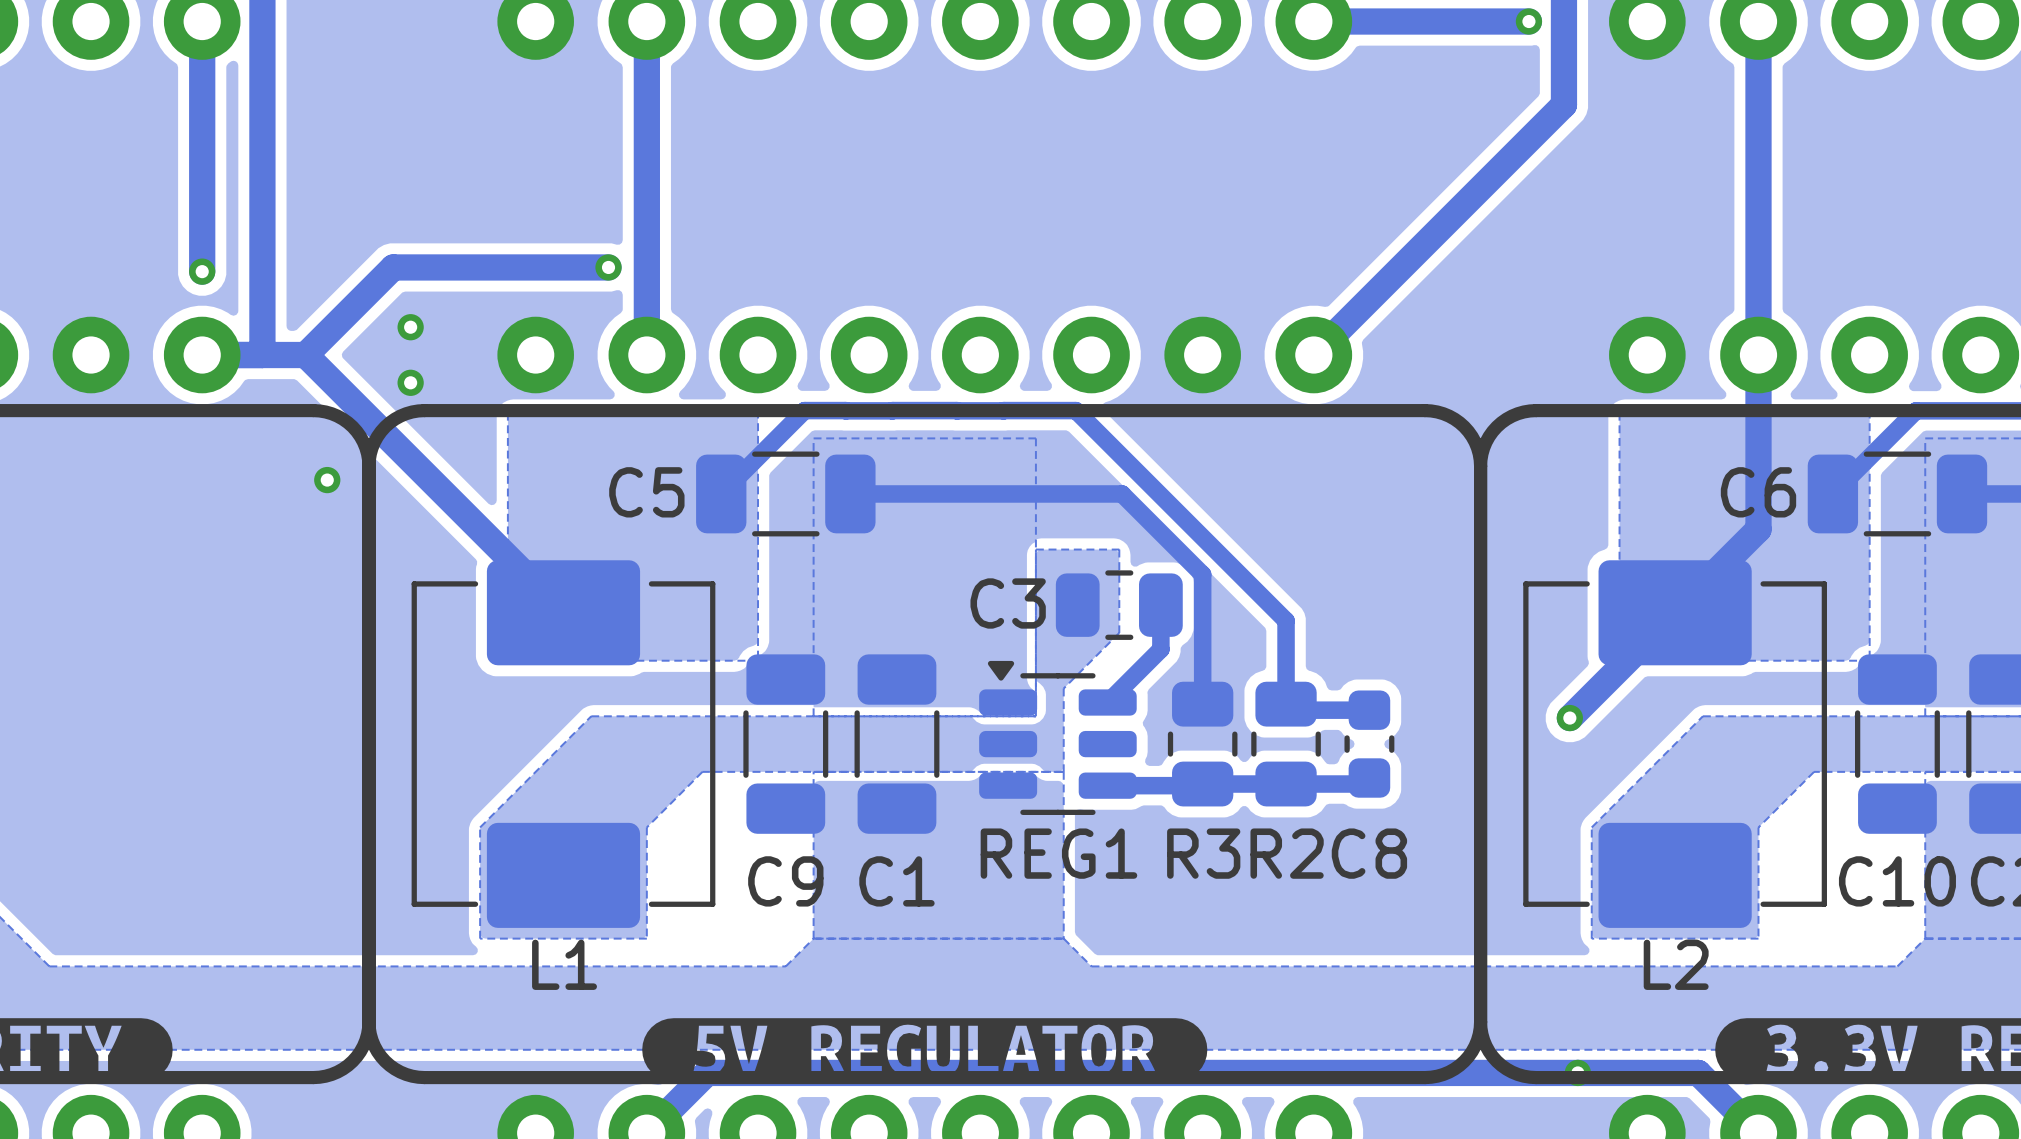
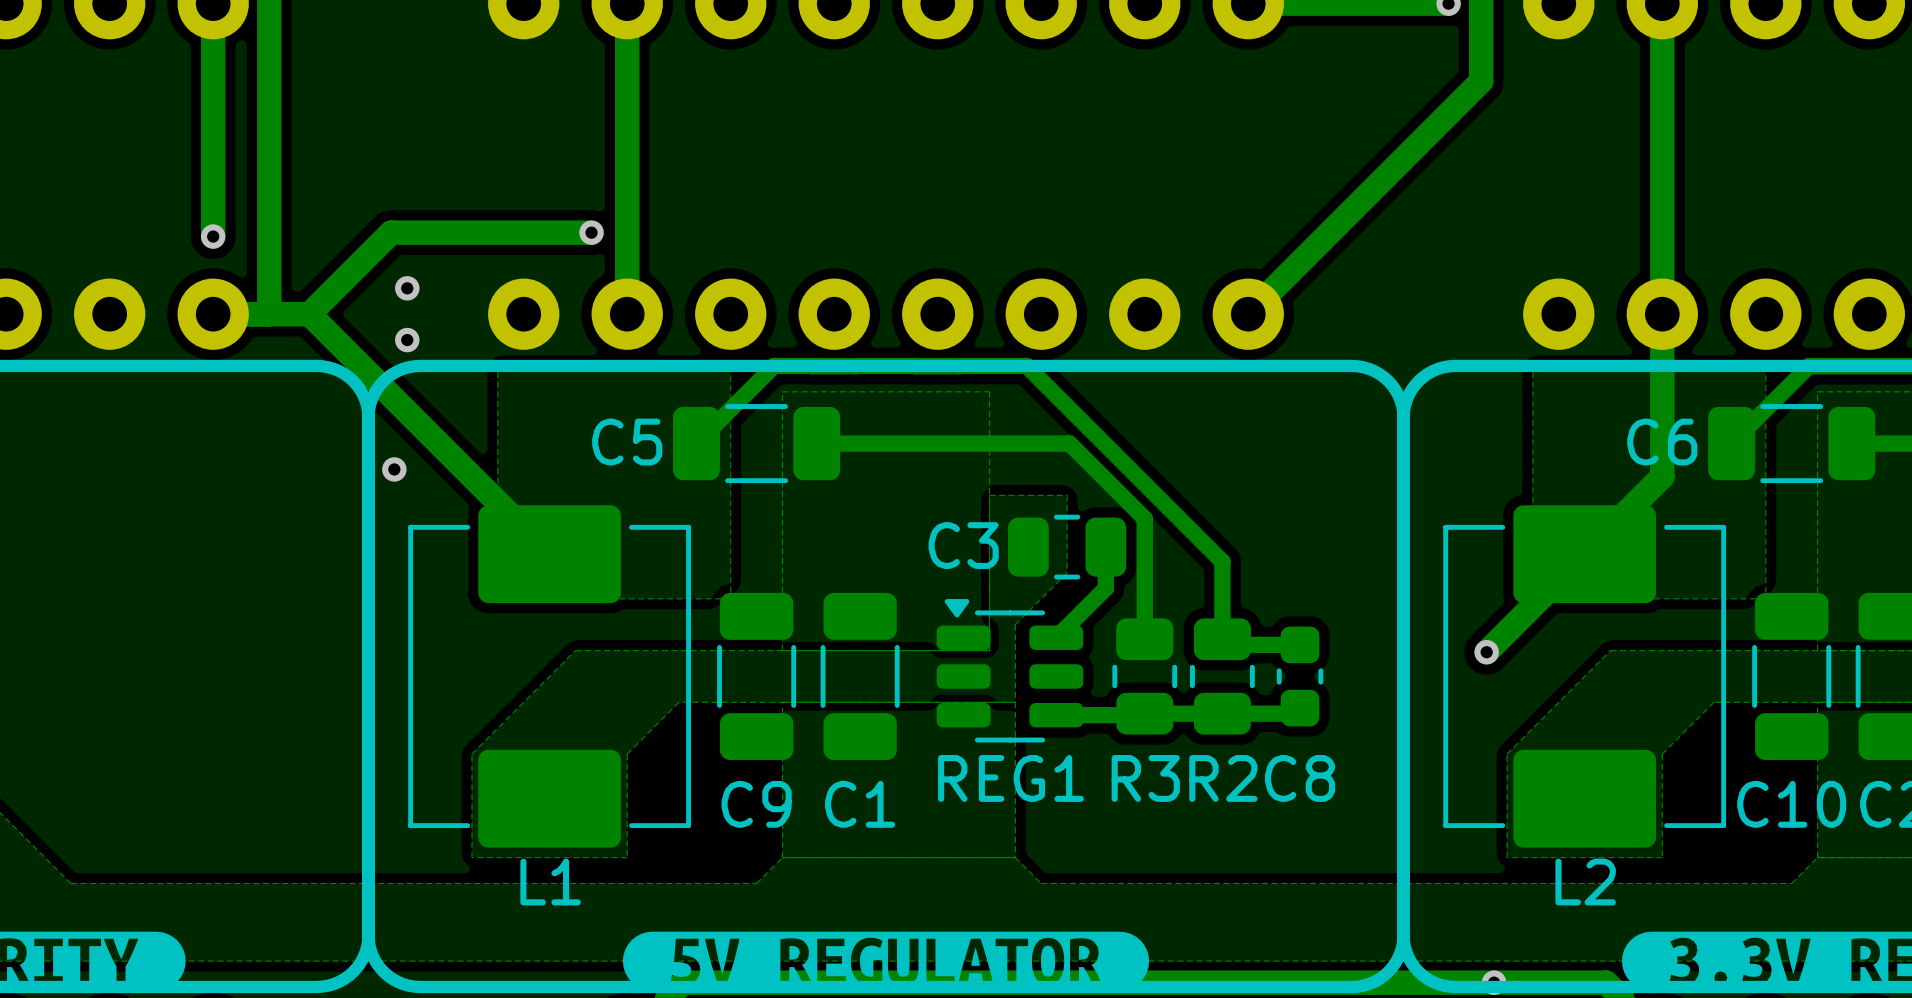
via position: (327, 480) -> (394, 469)

